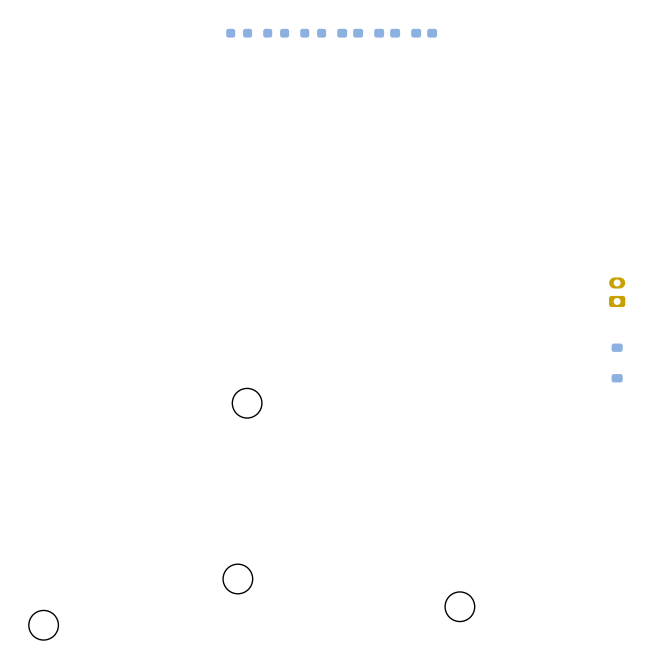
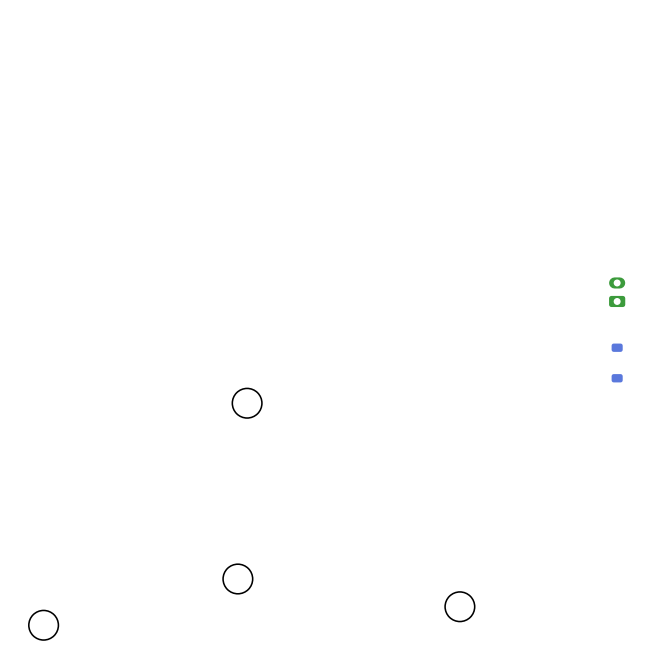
part: (239, 33) -> none
part: (276, 33) -> none
part: (313, 33) -> none
part: (350, 33) -> none
part: (387, 33) -> none
part: (424, 33) -> none

